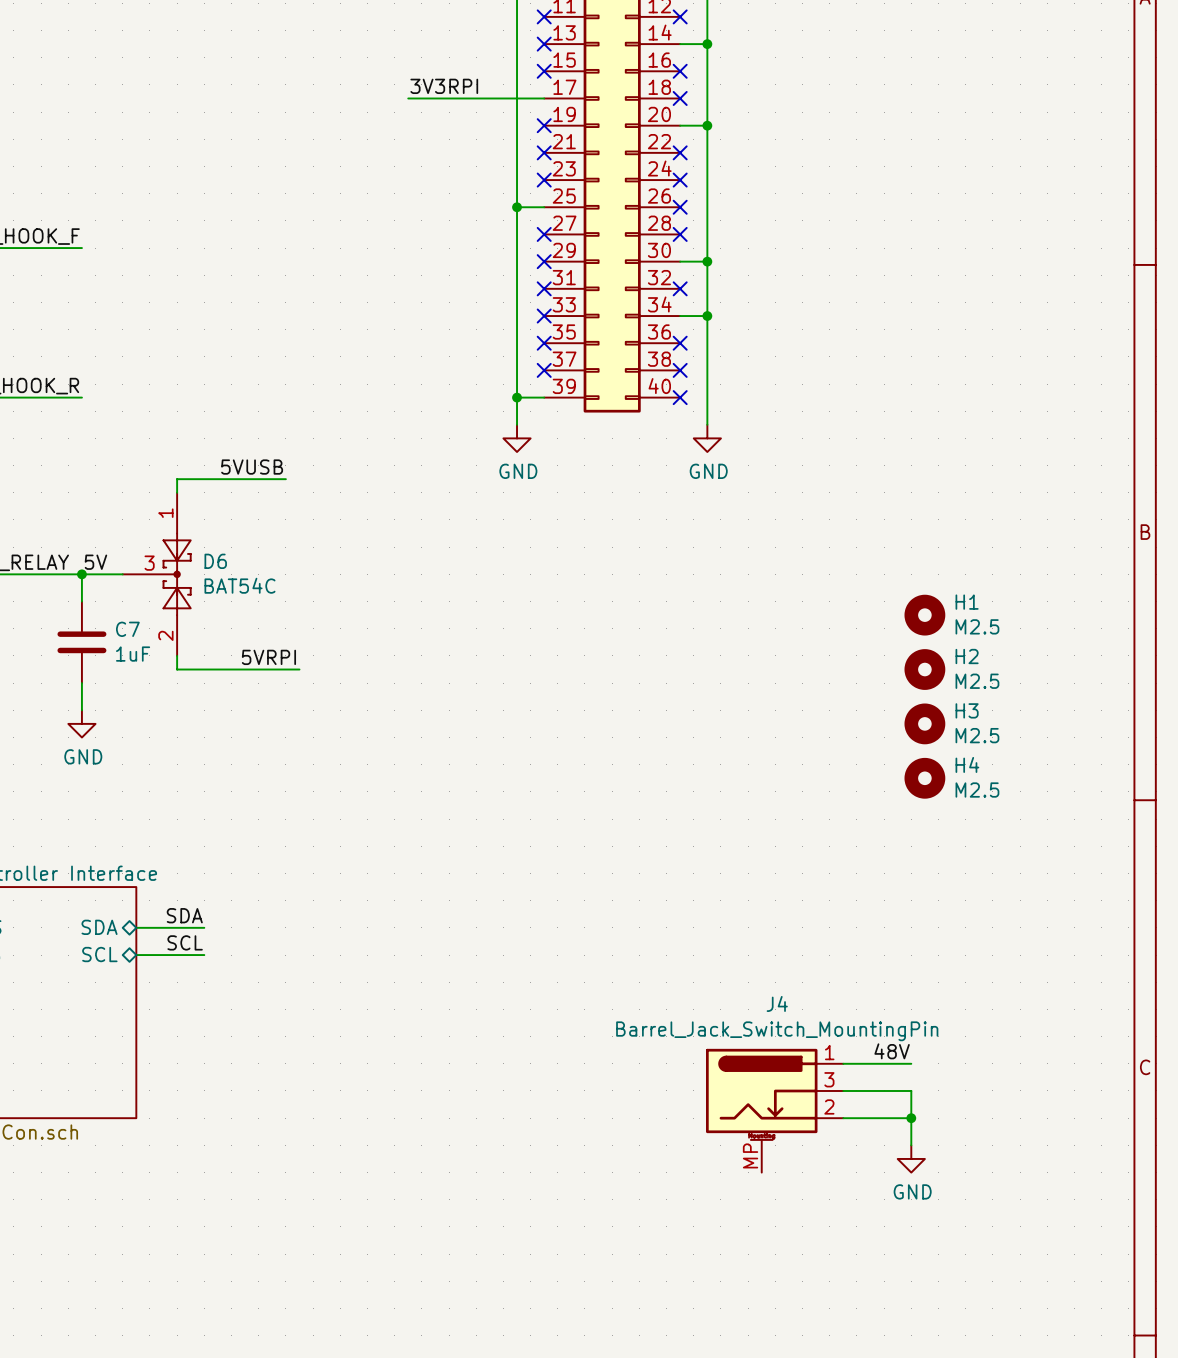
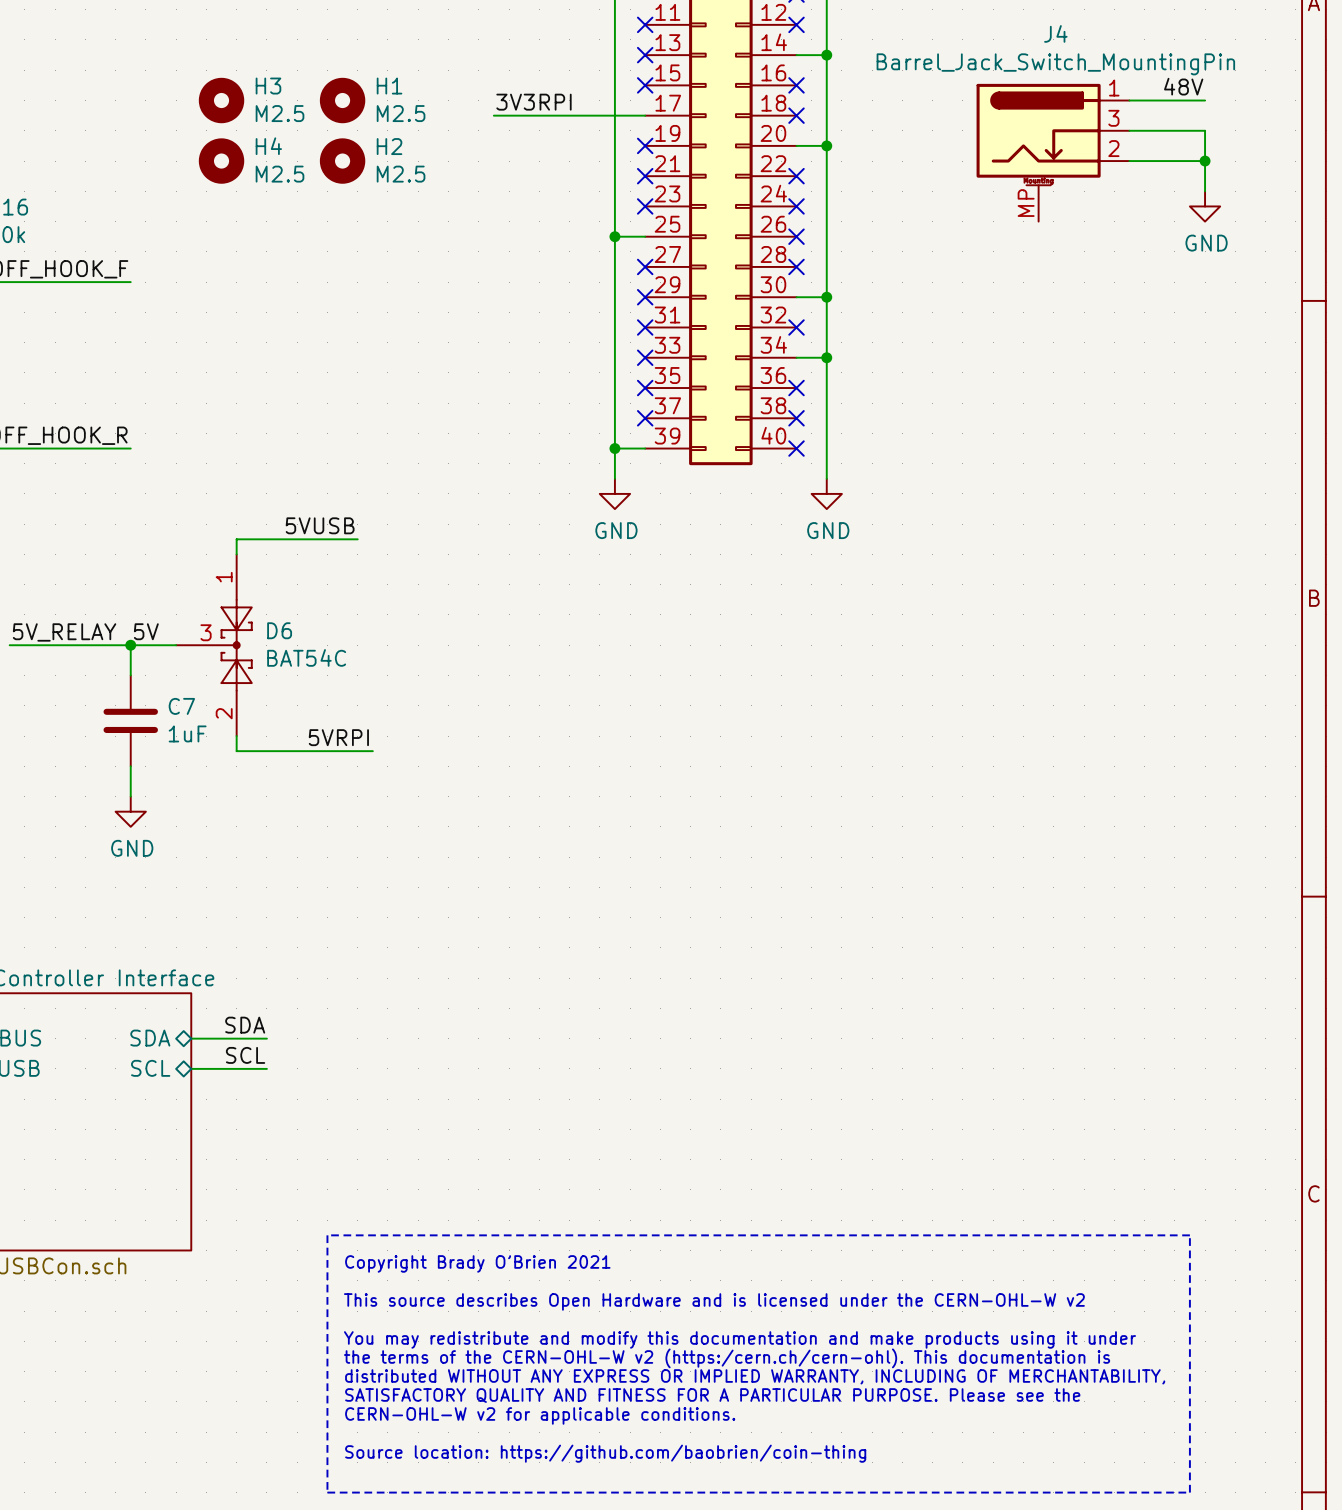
label: none -> 48V (1183, 86)
wire: none -> (1129, 100) (1205, 100)
wire: none -> (1129, 130) (1205, 130) (1205, 191)
wire: none -> (1129, 161) (1205, 161)
junction: none -> (1205, 161)
power symbol: none -> GND (1205, 206)
H1 position: (924, 615) -> (342, 100)
H2 position: (924, 669) -> (342, 161)
H3 position: (924, 723) -> (221, 100)
H4 position: (924, 778) -> (221, 161)
label: 48V (892, 1051) -> none
wire: (843, 1063) (911, 1063) -> none
wire: (843, 1090) (911, 1090) (911, 1145) -> none
line: none -> (327, 1235) (327, 1492) (1189, 1492) (1189, 1235) (327, 1235)
J4 position: (774, 1110) -> (1052, 152)
wire: (843, 1118) (911, 1118) -> none
junction: (911, 1118) -> none
text: none -> Copyright Brady O’Brien 2021 (477, 1263)
power symbol: GND (911, 1158) -> none
text: none -> This source describes Open Hardware and is licensed under the CERN-OHL-W v2 (714, 1301)
text: none -> You may redistribute and modify this documentation and make products using it under (739, 1339)
text: none -> the terms of the CERN-OHL-W v2 (https:/cern.ch/cern-ohl). This documentation is (727, 1358)
text: none -> distributed WITHOUT ANY EXPRESS OR IMPLIED WARRANTY, INCLUDING OF MERCHANTABILITY, (755, 1376)
text: none -> SATISFACTORY QUALITY AND FITNESS FOR A PARTICULAR PURPOSE. Please see the (712, 1395)
text: none -> CERN-OHL-W v2 for applicable conditions. (540, 1415)
text: none -> Source location: https://github.com/baobrien/coin-thing (605, 1453)

